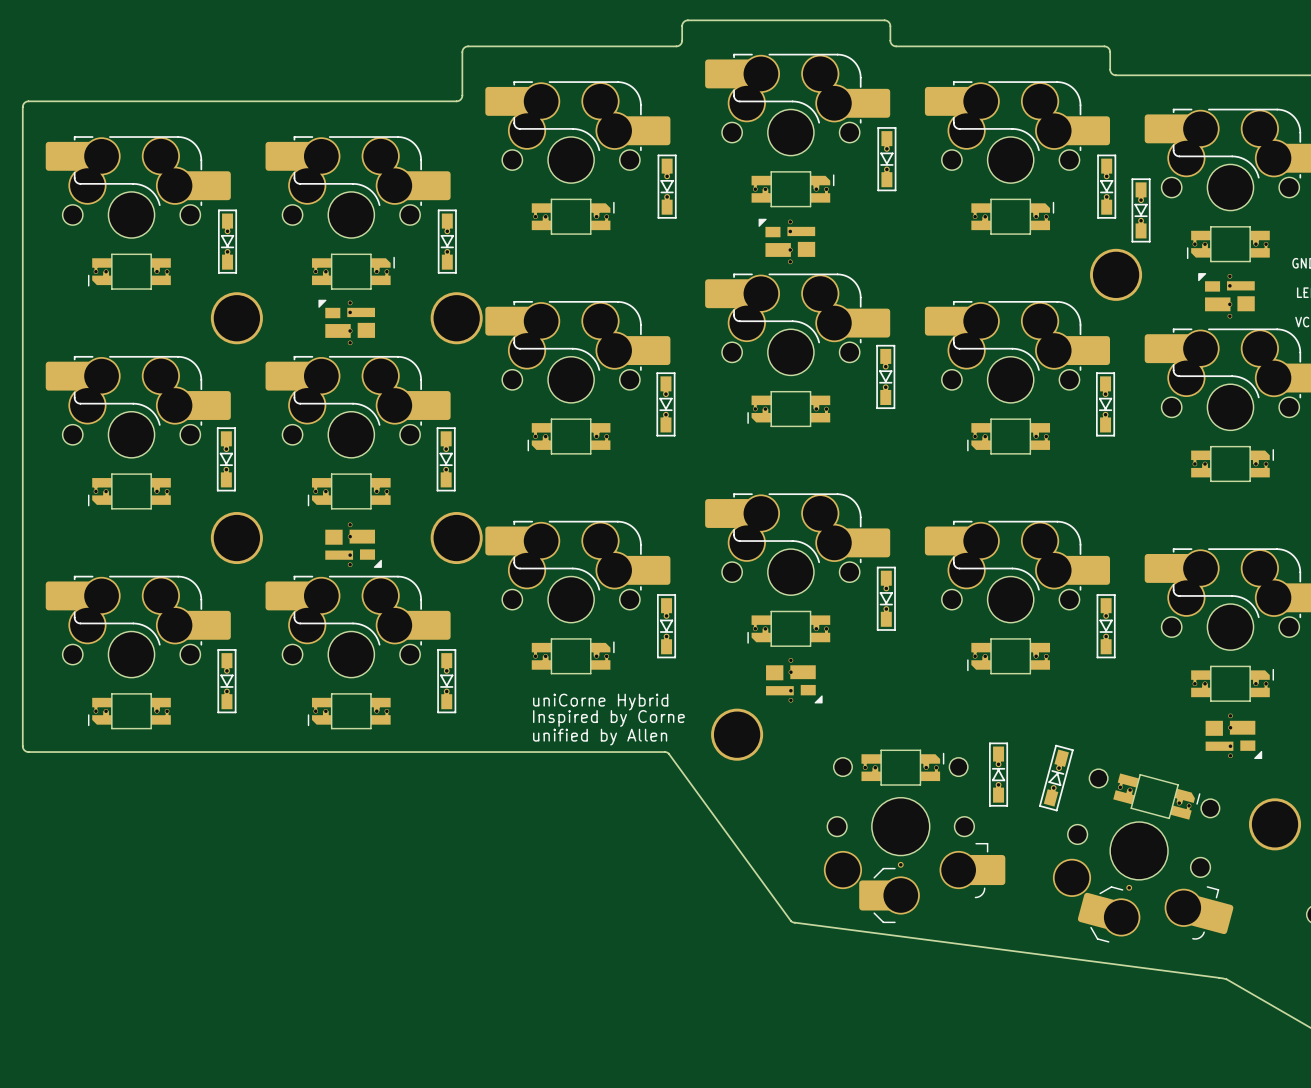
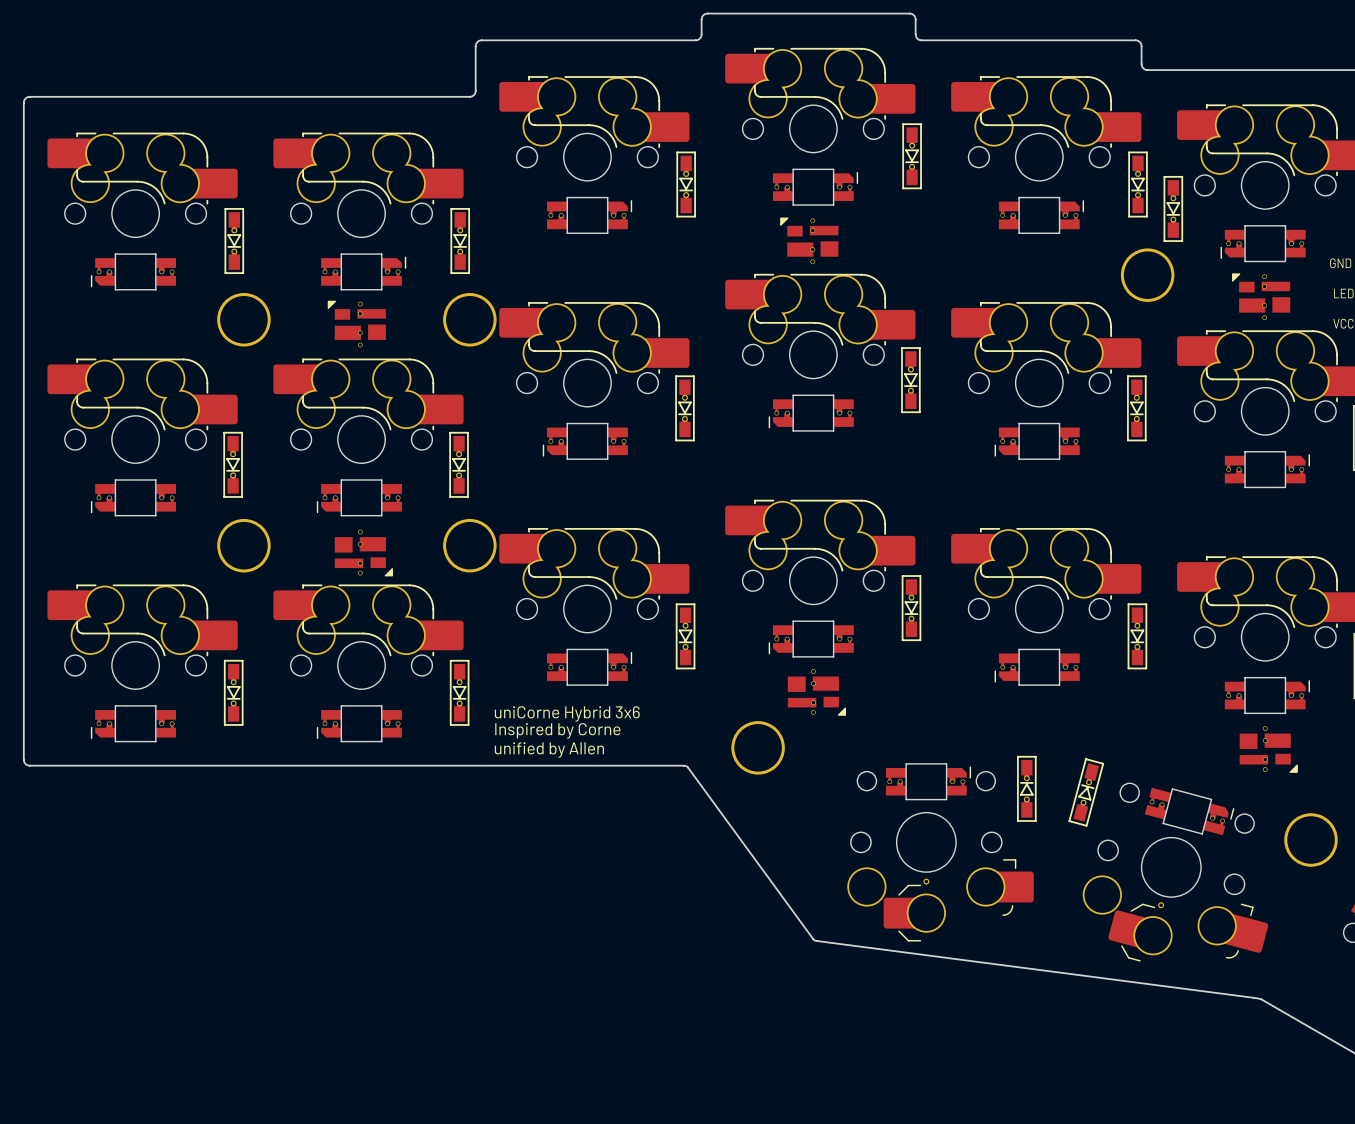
text: uniCorne Hybrid (600, 702) -> uniCorne Hybrid 3x6 (567, 713)
text position: Inspired by Corne (608, 718) -> Inspired by Corne (557, 730)
text position: unified by Allen (600, 737) -> unified by Allen (549, 749)

